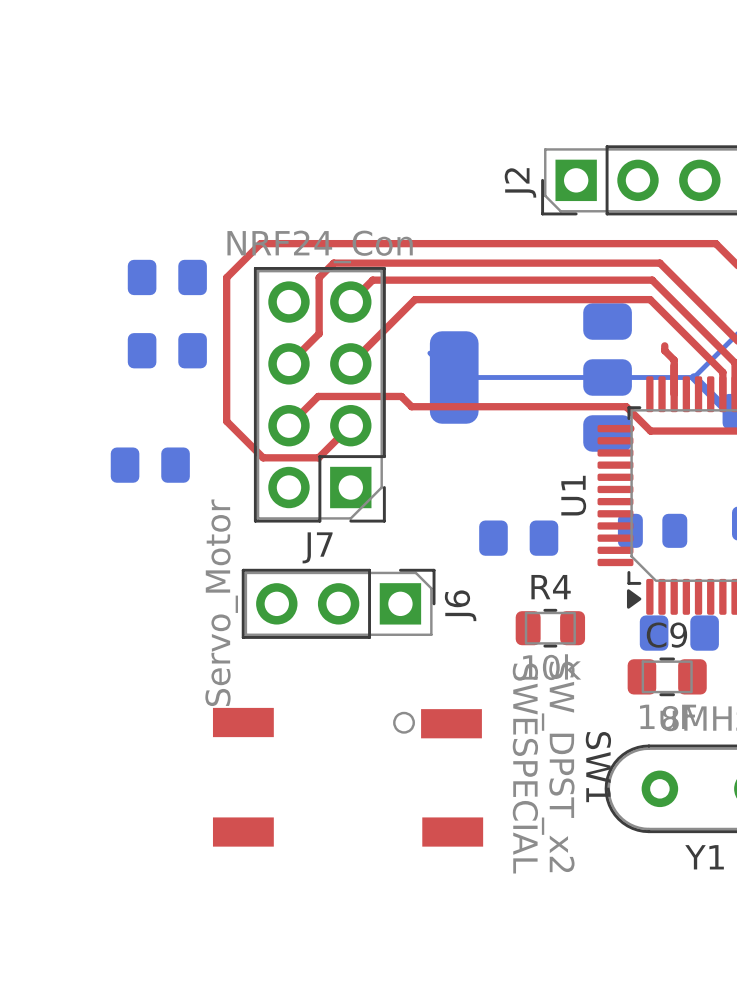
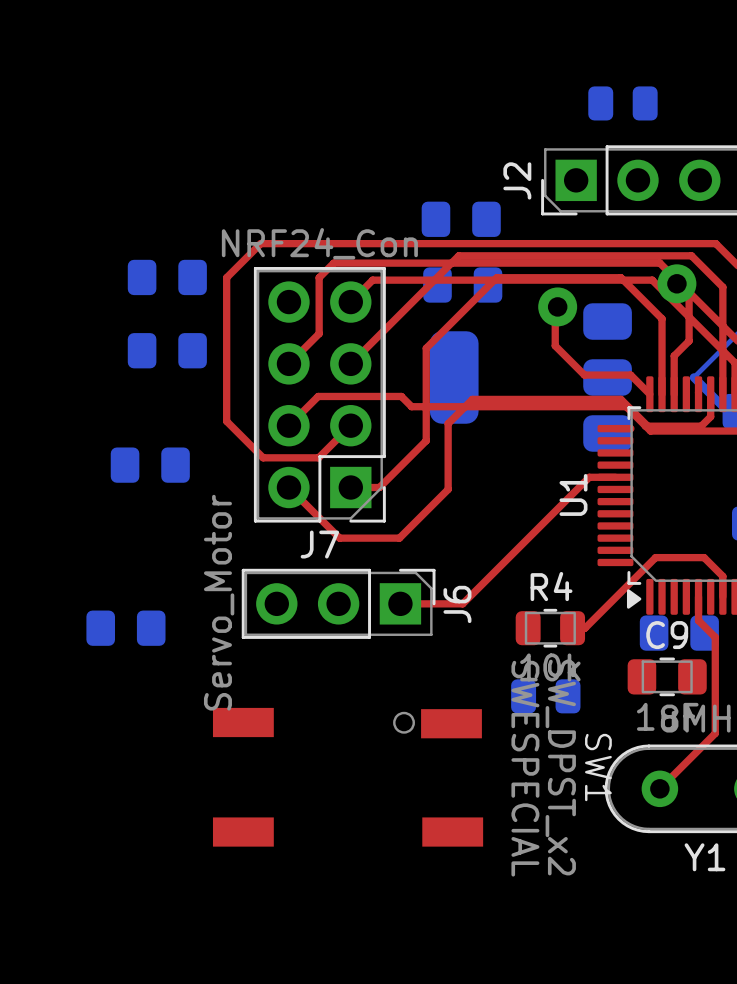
part: none -> (622, 103)
part: none -> (461, 219)
via: none -> (676, 283)
part: none -> (462, 285)
top track: (415, 299) (650, 299) (722, 372) -> (415, 299) (458, 255) (691, 255) (722, 287) (722, 372)
top track: none -> (557, 306) (555, 309) (555, 345) (584, 375) (630, 375) (649, 394)
via: none -> (557, 306)
top track: (664, 345) (664, 350) (674, 360) -> (676, 283) (689, 295) (689, 340) (674, 355) (674, 360)
bottom track: (429, 353) (454, 377) (693, 377) -> none
top track: none -> (662, 394) (662, 318) (620, 277) (496, 277) (426, 348) (426, 440) (379, 487) (350, 487)
top track: none -> (710, 394) (710, 416) (701, 426) (645, 426)
top track: none -> (647, 426) (620, 399) (472, 399) (448, 423) (448, 489) (399, 538) (339, 538) (288, 487)
top track: none -> (615, 477) (589, 477) (462, 603) (400, 603)
part position: (652, 530) -> (545, 696)
part: (518, 538) -> none
top track: none -> (698, 596) (698, 620) (715, 637) (715, 733) (659, 788)
top track: none -> (722, 596) (722, 576) (704, 557) (655, 557) (585, 628) (572, 628)
part: none -> (125, 628)

